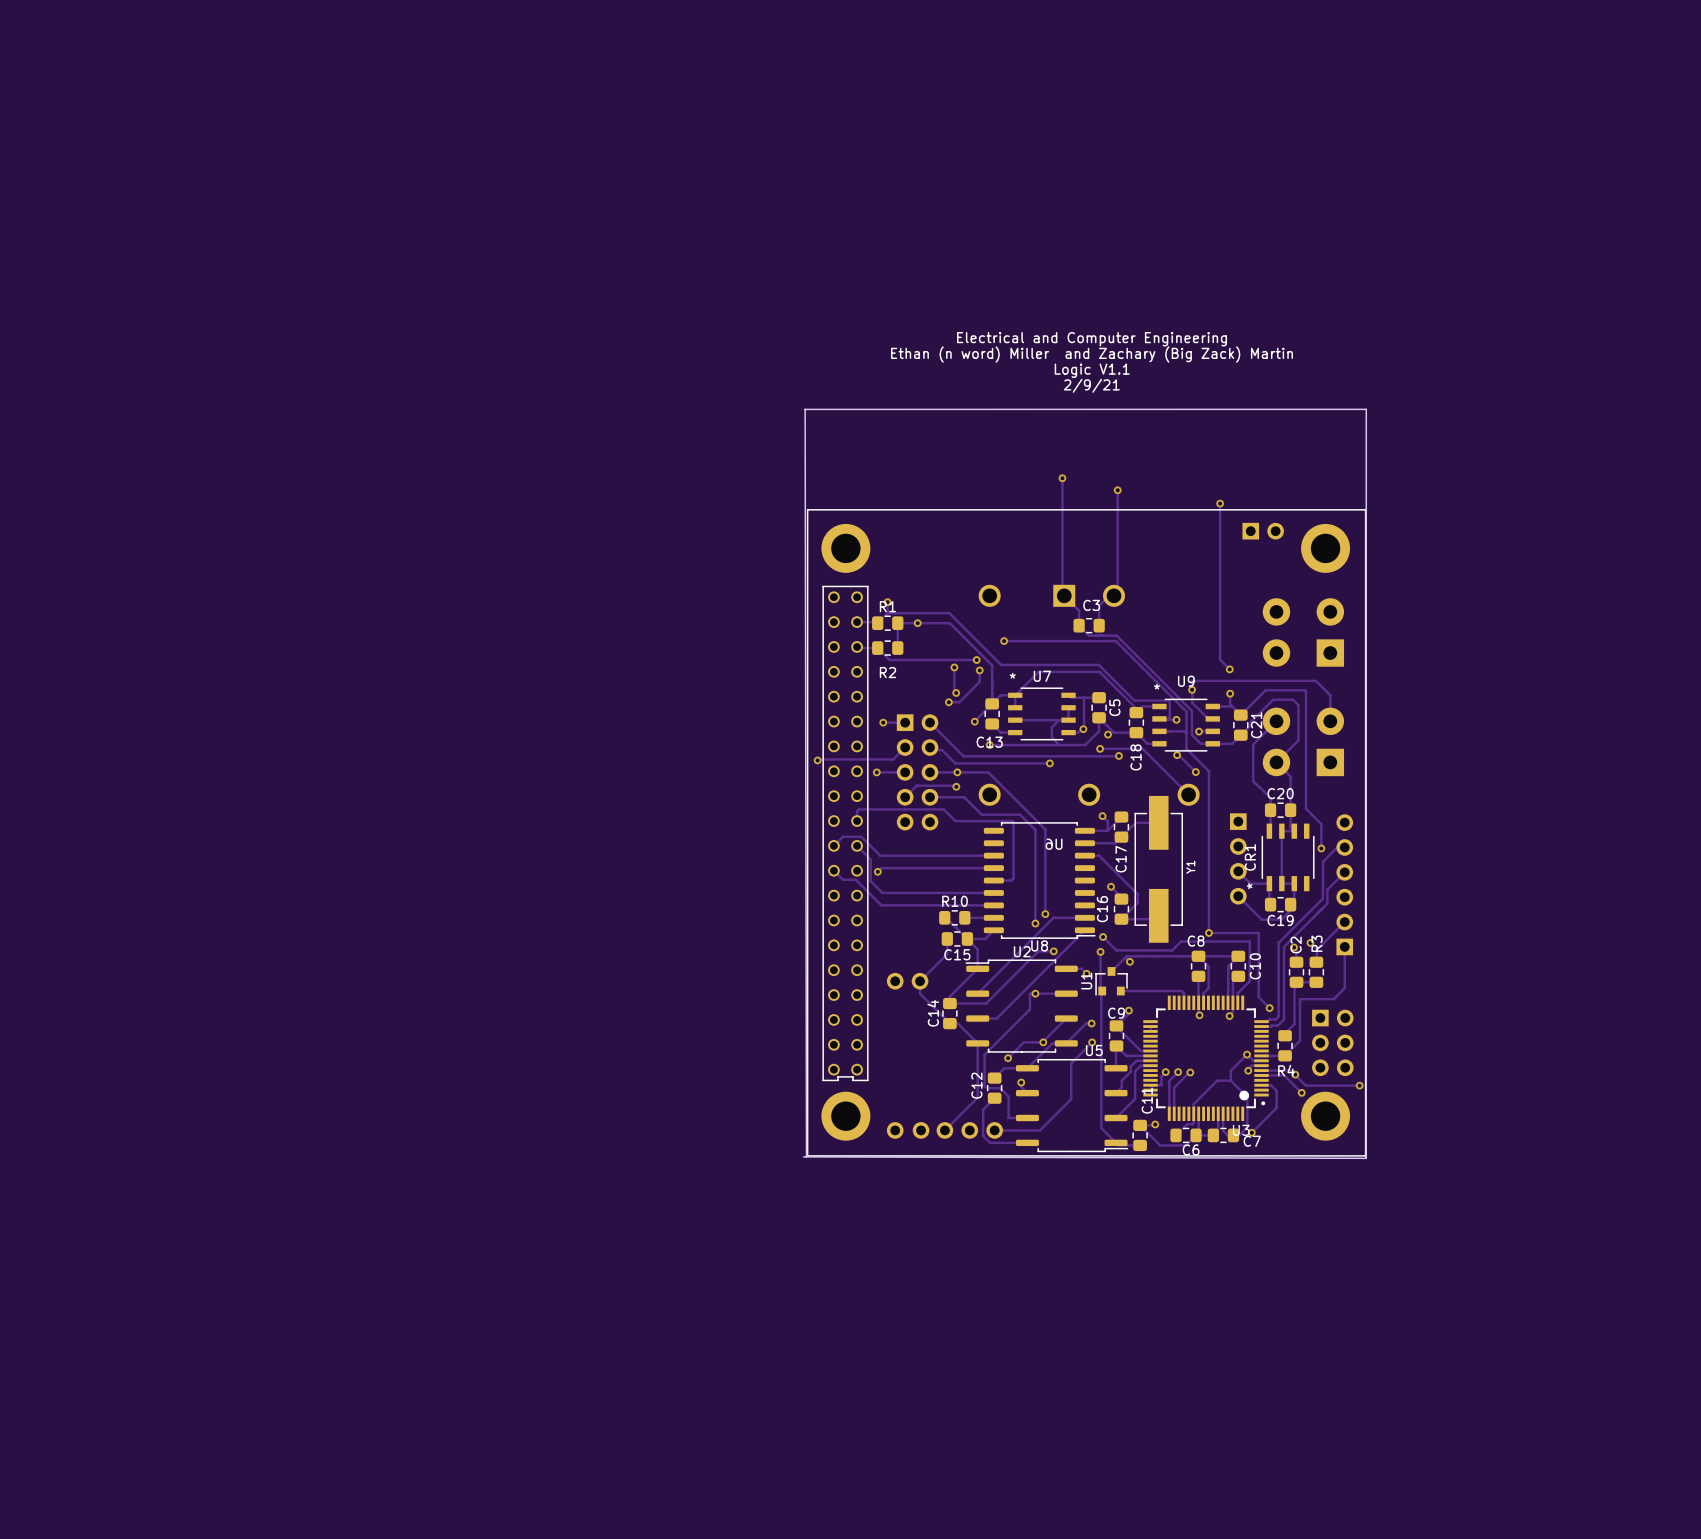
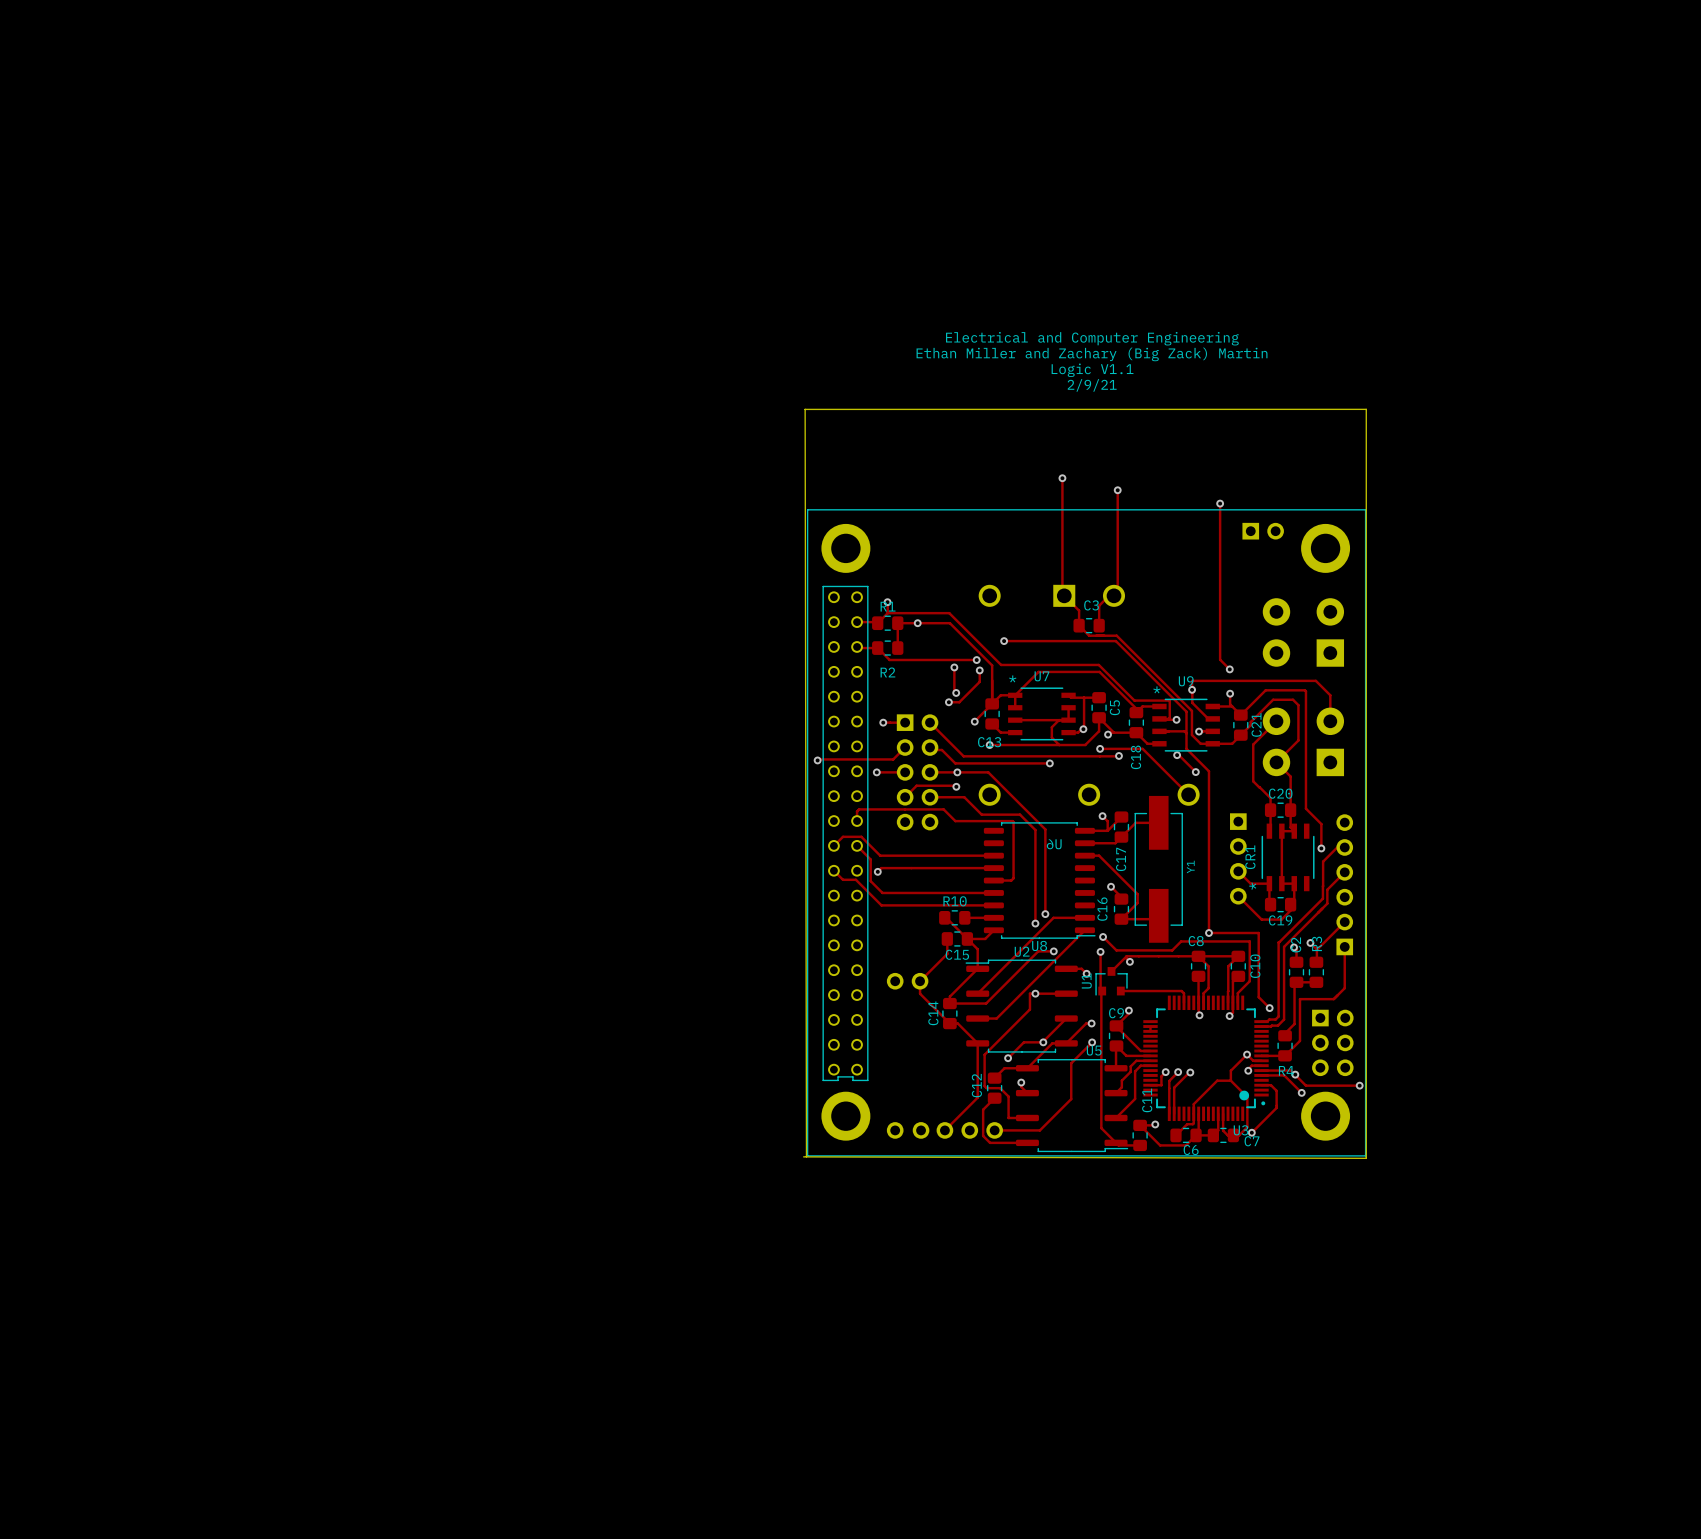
text: Ethan (n word) Miller and Zachary (Big Zack) Martin (1092, 354) -> Ethan Miller and Zachary (Big Zack) Martin (1092, 354)

